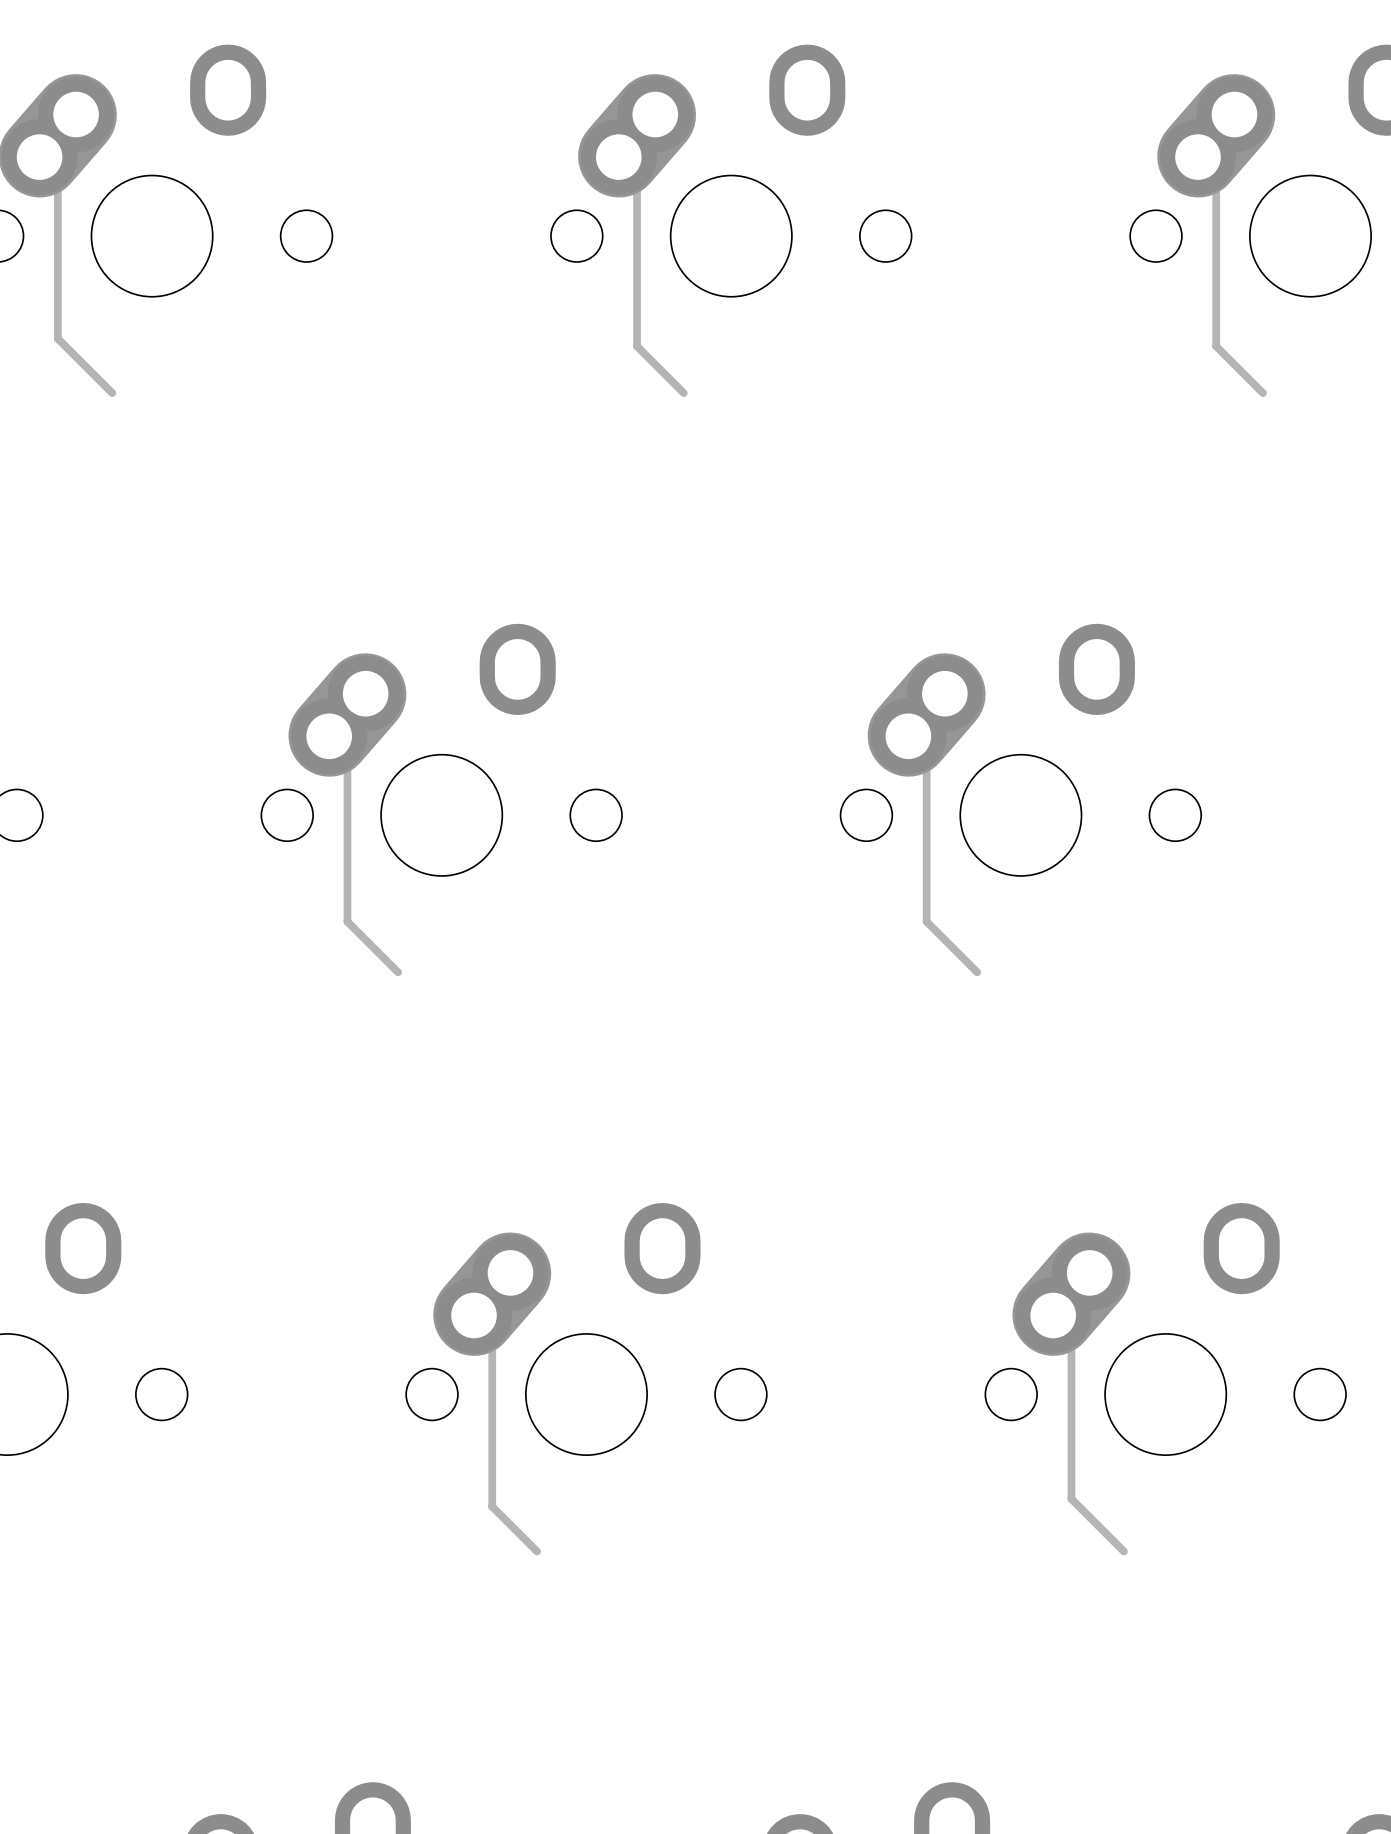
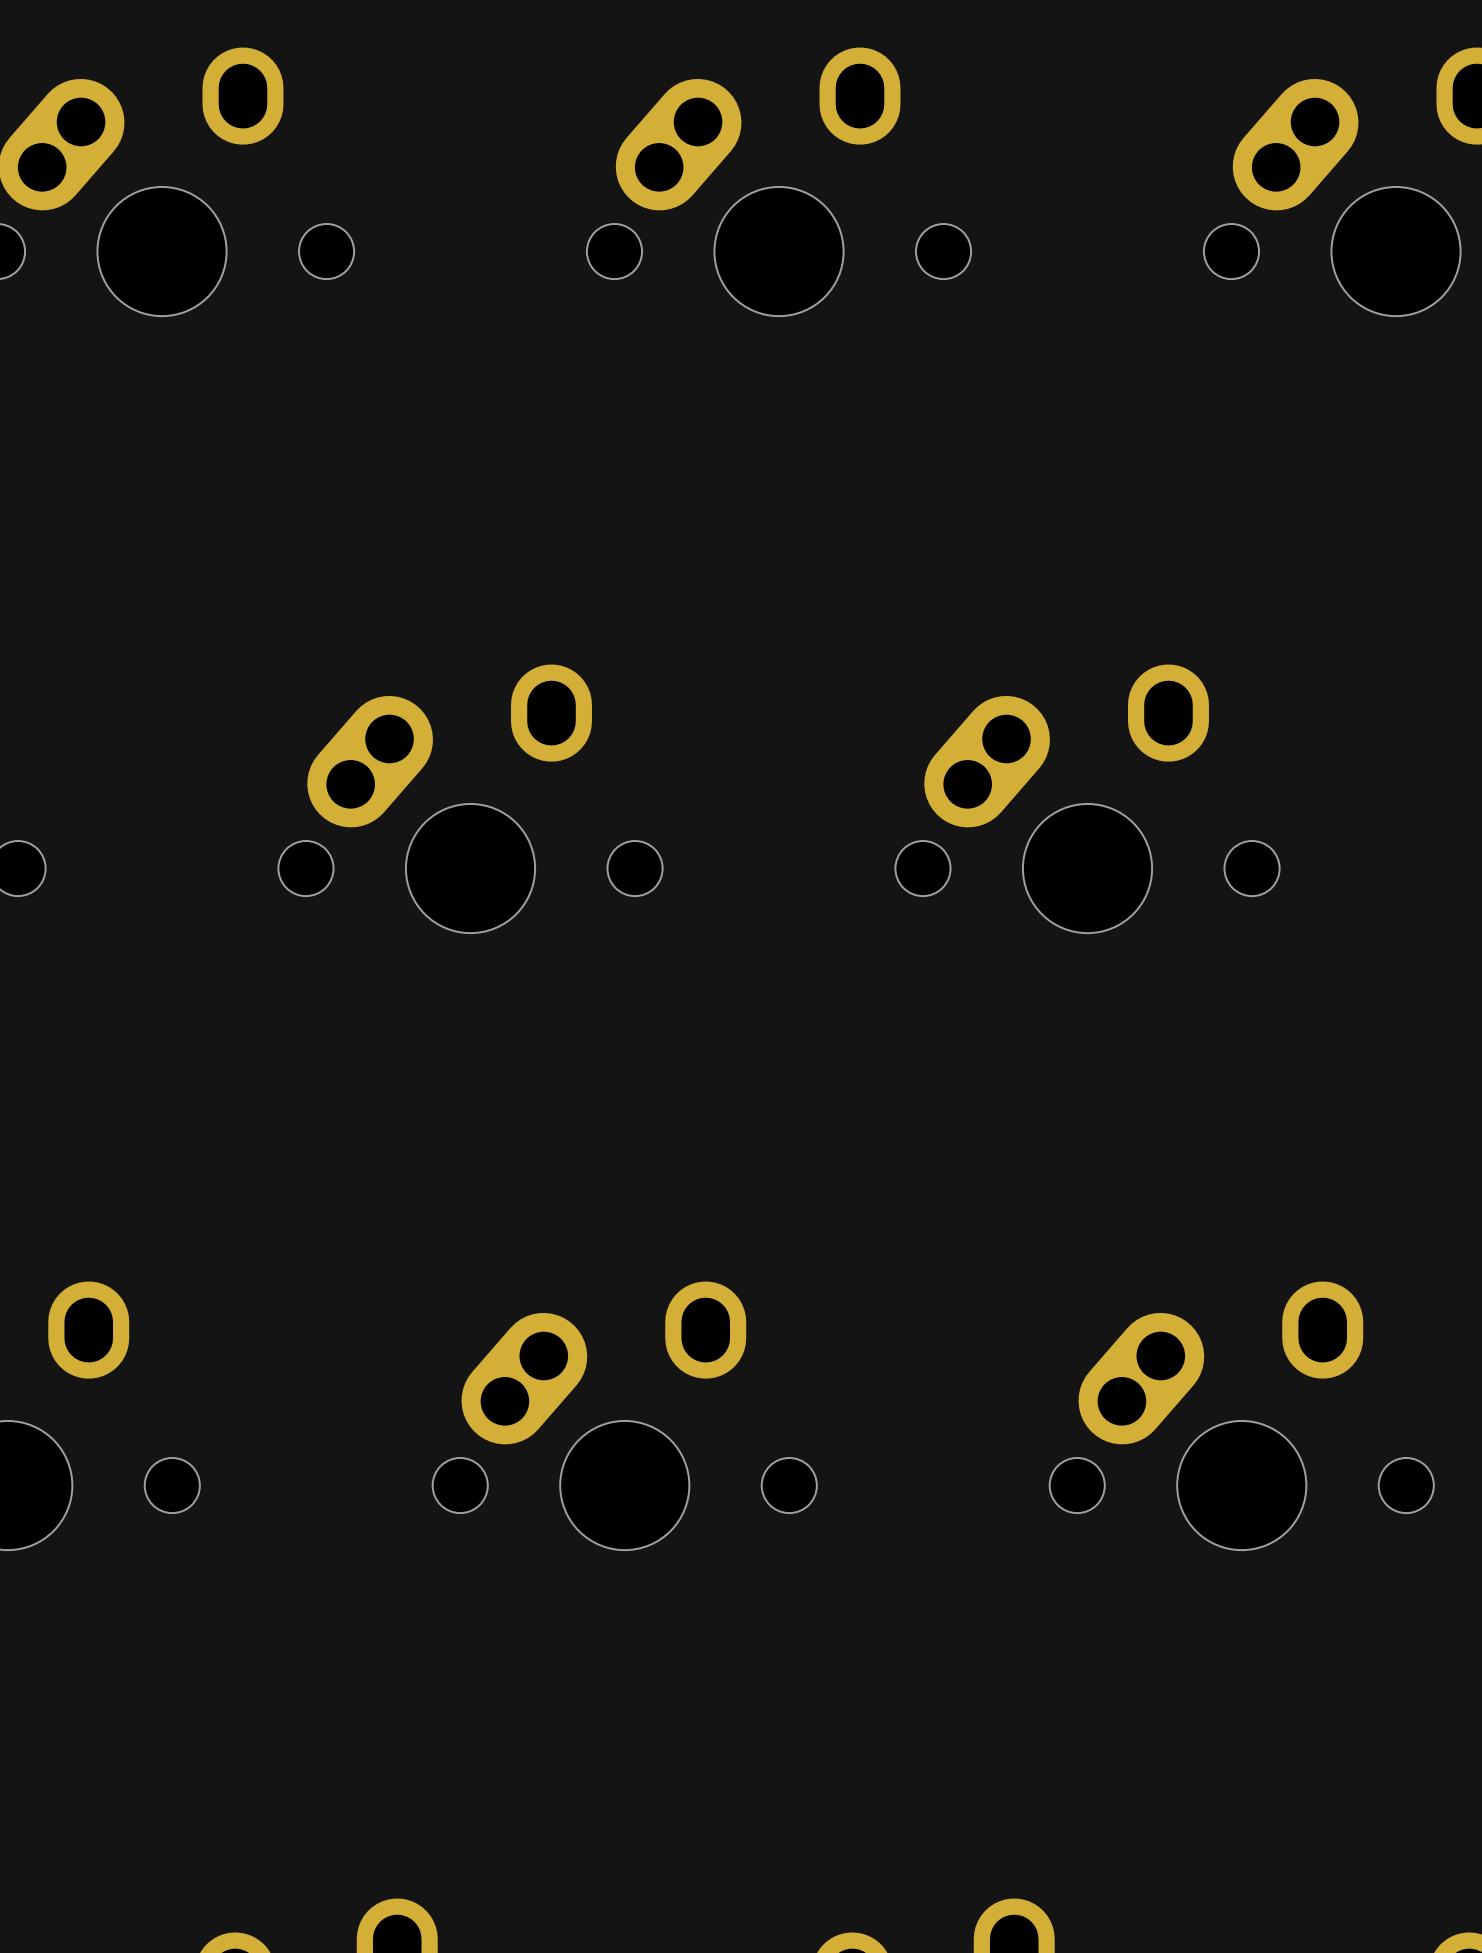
track: (57, 135) (57, 338) (112, 393) -> none
track: (637, 135) (637, 346) (683, 393) -> none
track: (1216, 135) (1216, 346) (1262, 393) -> none
track: (347, 715) (347, 921) (398, 972) -> none
track: (926, 715) (926, 921) (977, 972) -> none
track: (492, 1294) (492, 1506) (537, 1551) -> none
track: (1071, 1294) (1071, 1498) (1123, 1551) -> none

